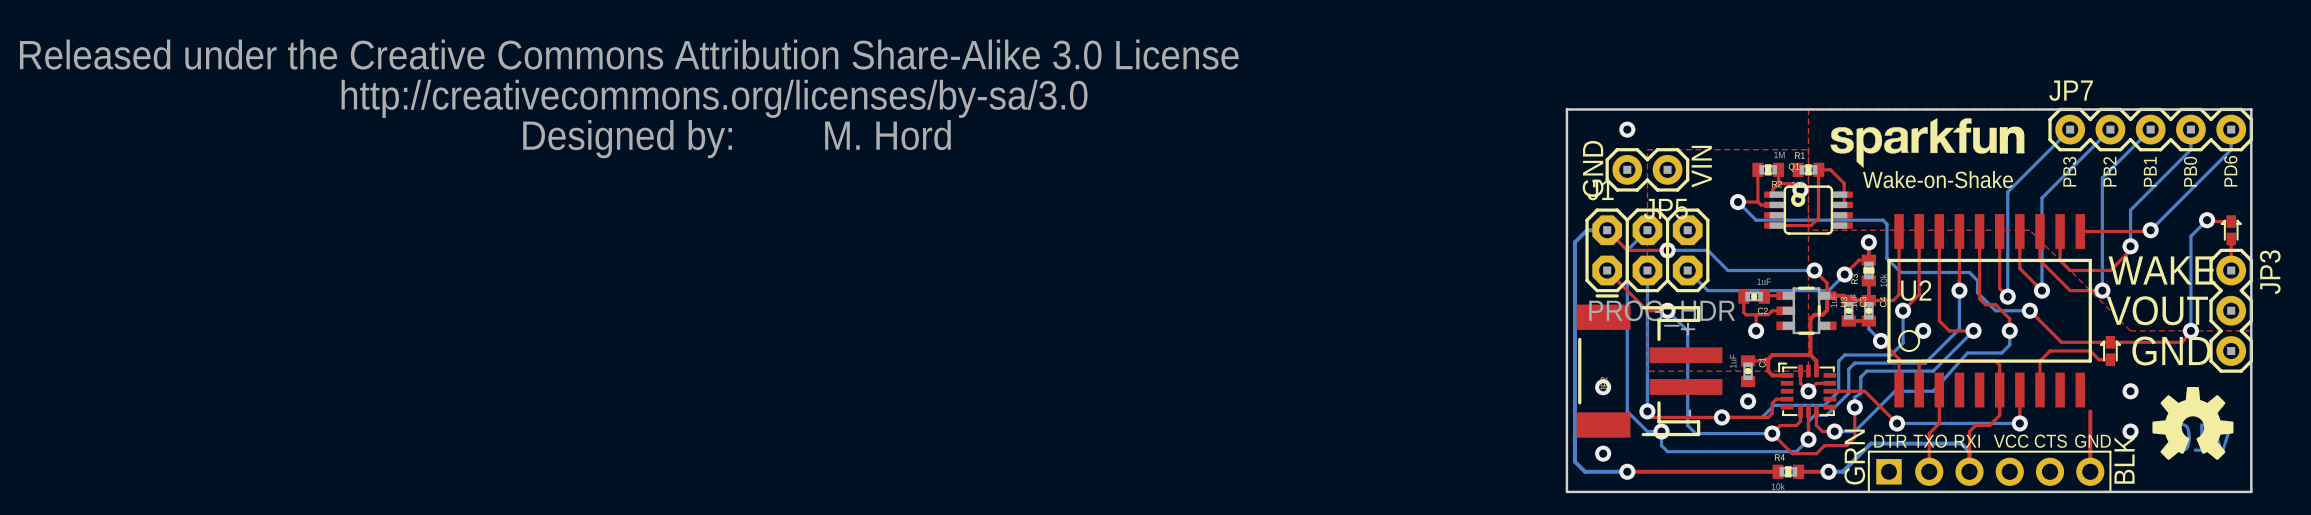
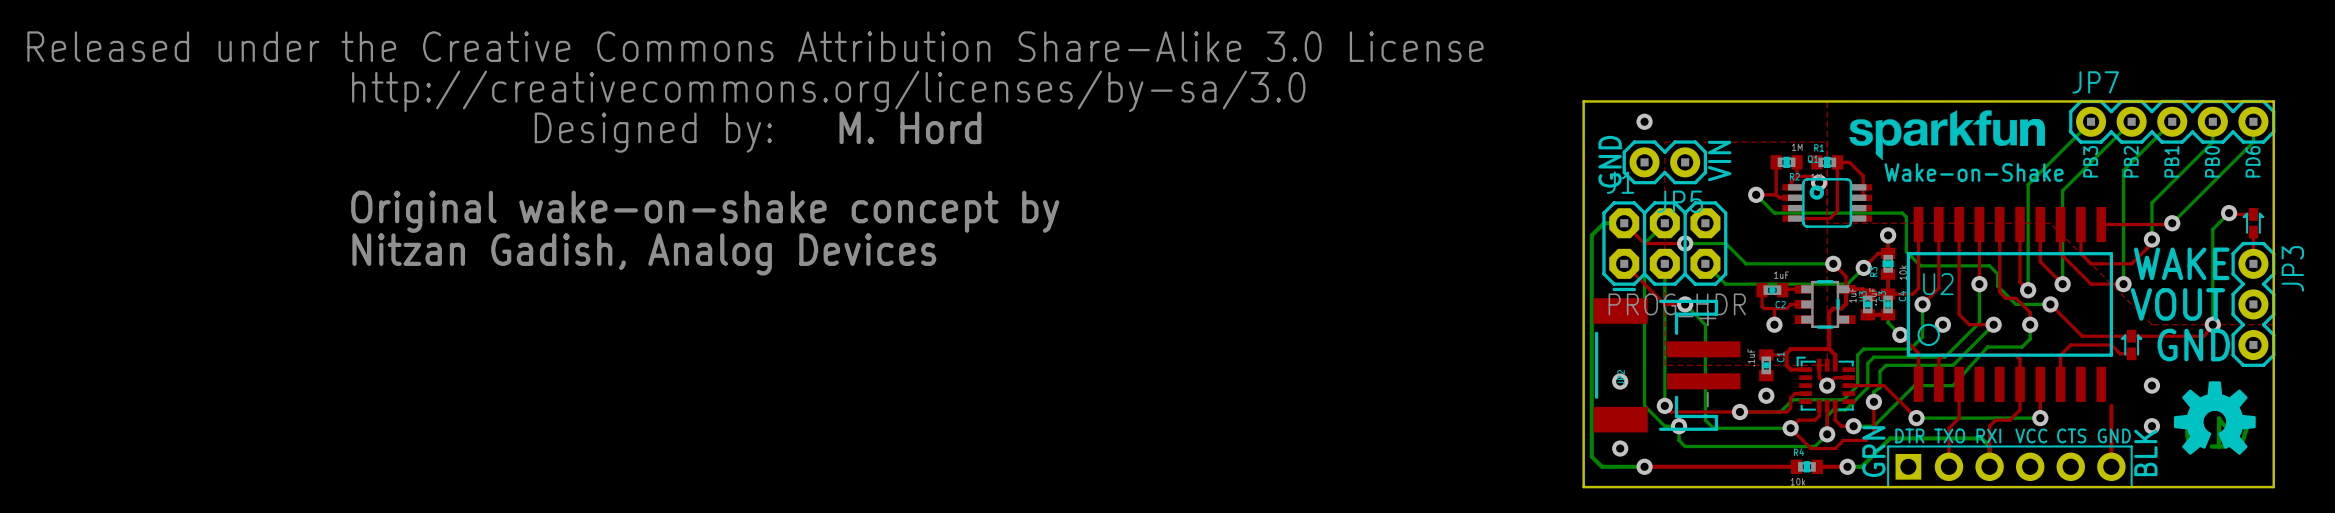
text: none -> Original wake-on-shake concept by (705, 211)
text: none -> Nitzan Gadish, Analog Devices (644, 254)

